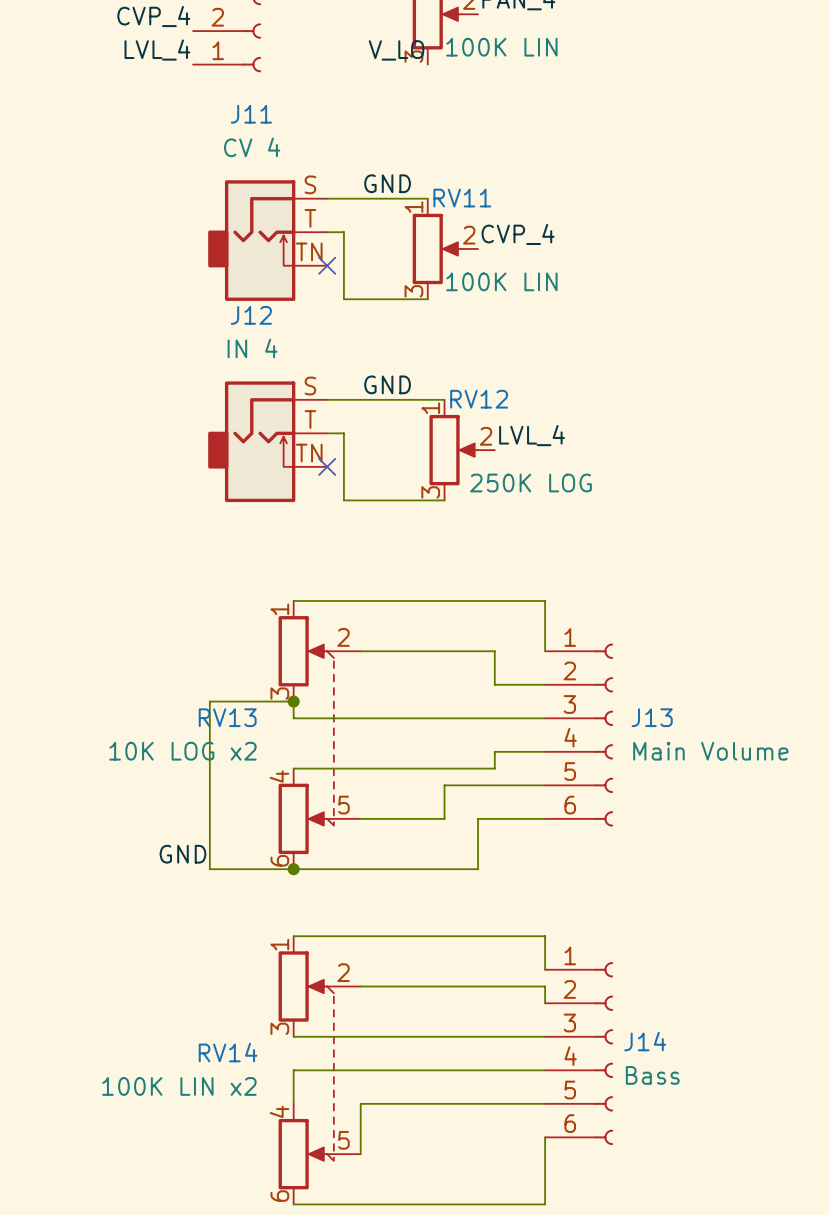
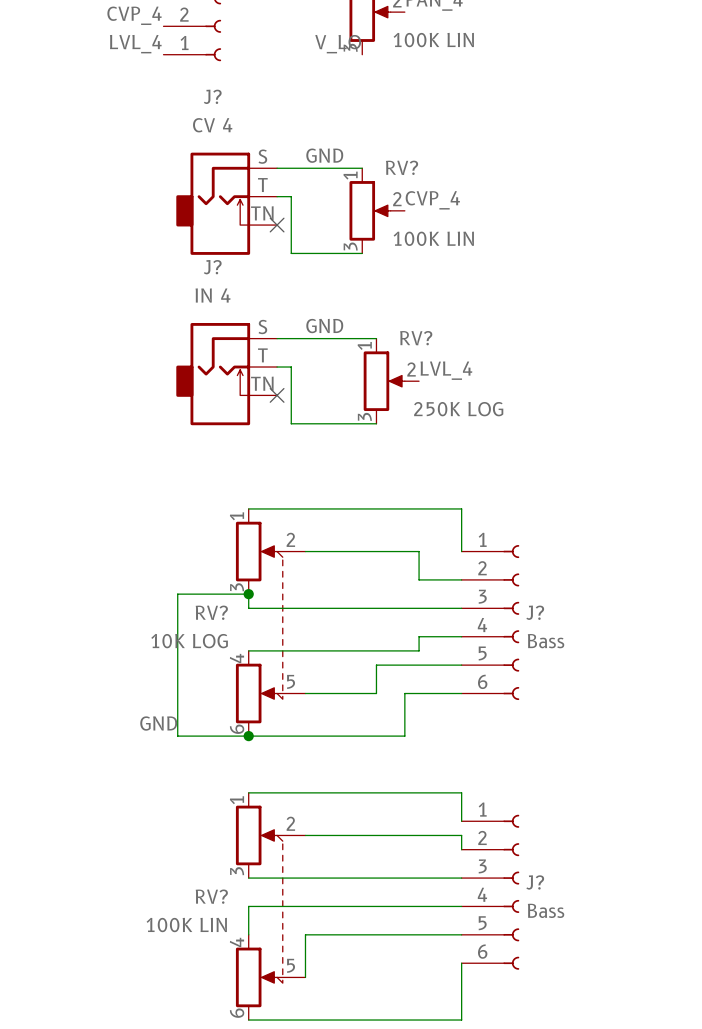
J11 name: J11 (251, 114) -> J? (212, 96)
RV11 name: RV11 (462, 198) -> RV? (402, 167)
J12 name: J12 (251, 315) -> J? (212, 267)
RV12 name: RV12 (479, 399) -> RV? (416, 338)
RV13 name: RV13 (227, 717) -> RV? (211, 612)
J13 name: J13 (652, 717) -> J? (535, 612)
RV13 value: 10K LOG x2 (182, 751) -> 10K LOG (189, 641)
J13 value: Main Volume (710, 751) -> Bass (546, 641)
J14 name: J14 (645, 1041) -> J? (535, 882)
RV14 name: RV14 (228, 1052) -> RV? (211, 896)
RV14 value: 100K LIN x2 (179, 1086) -> 100K LIN (186, 925)

